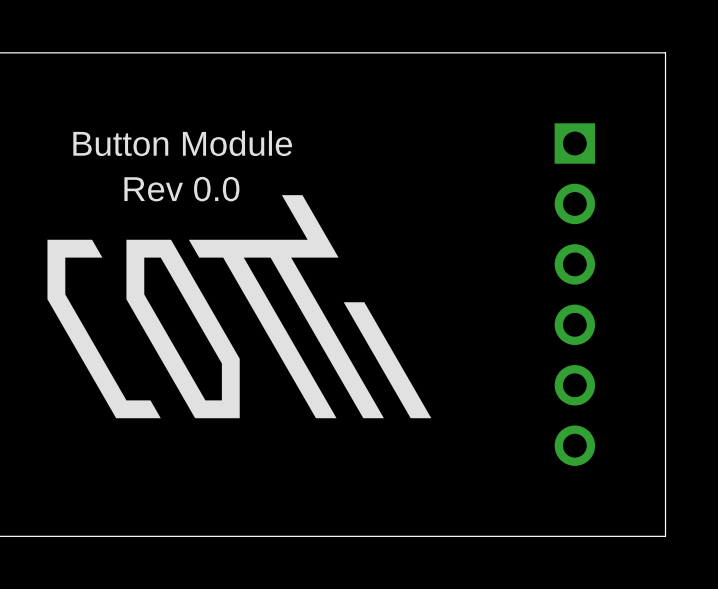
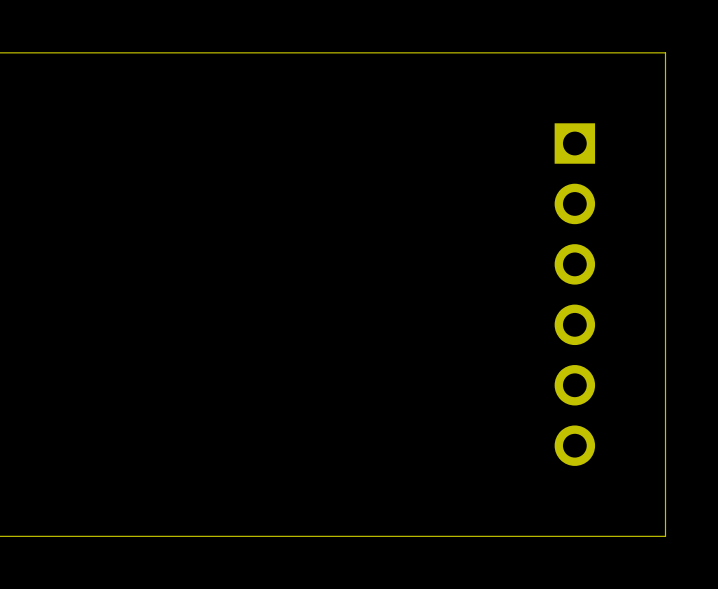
text: Button Module (182, 143) -> none
text: Rev 0.0 (181, 189) -> none
drawing: [47, 195, 432, 419] -> none

